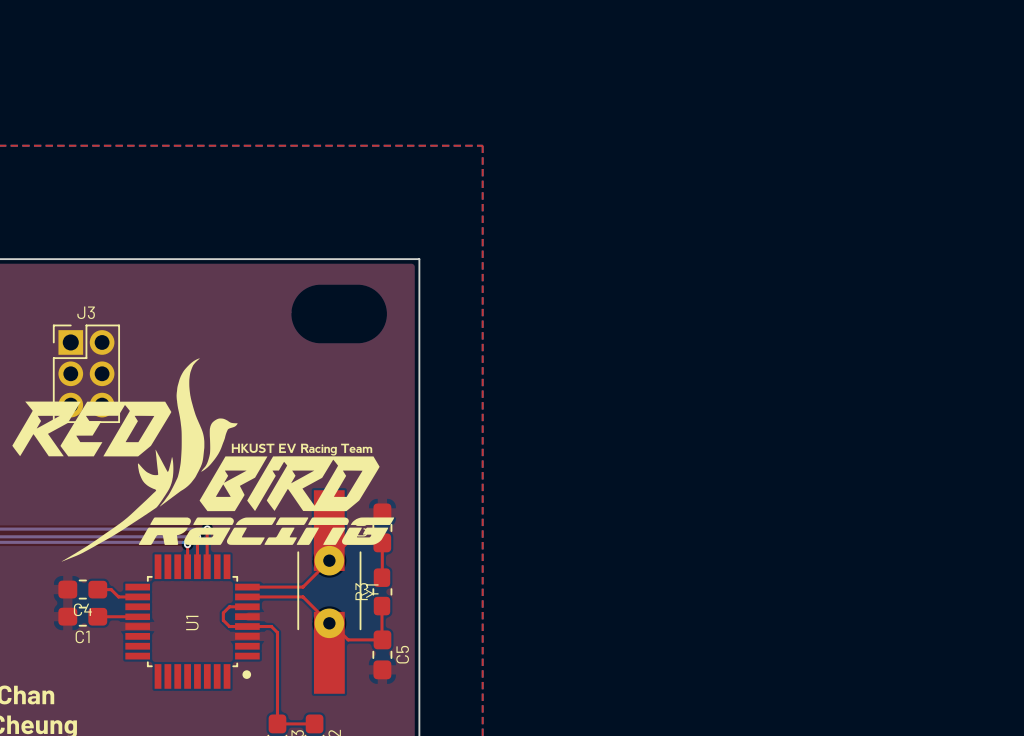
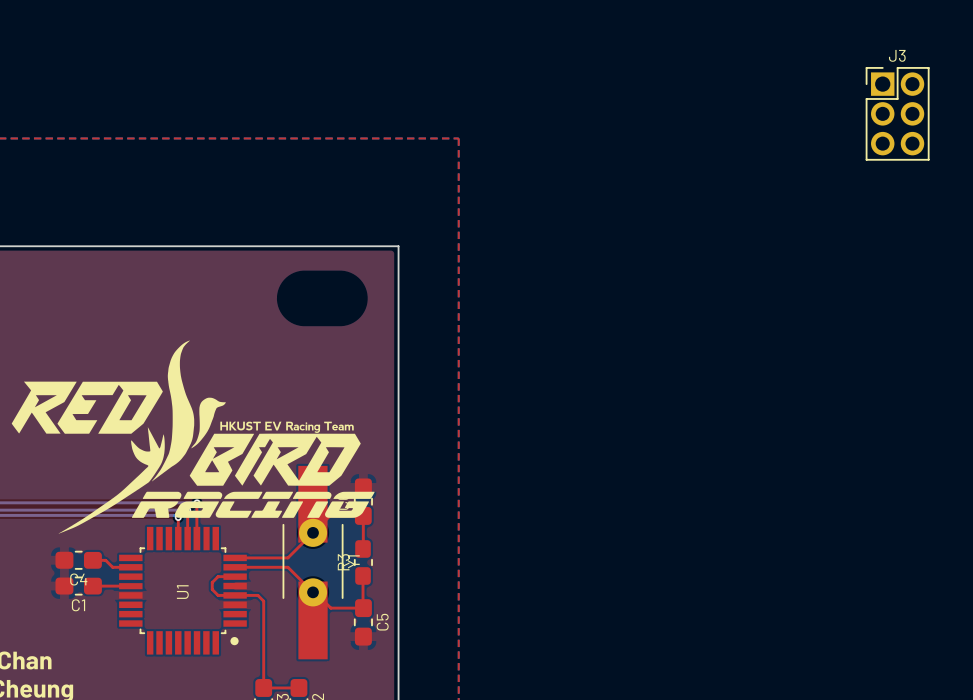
J3 position: (86, 373) -> (897, 113)

